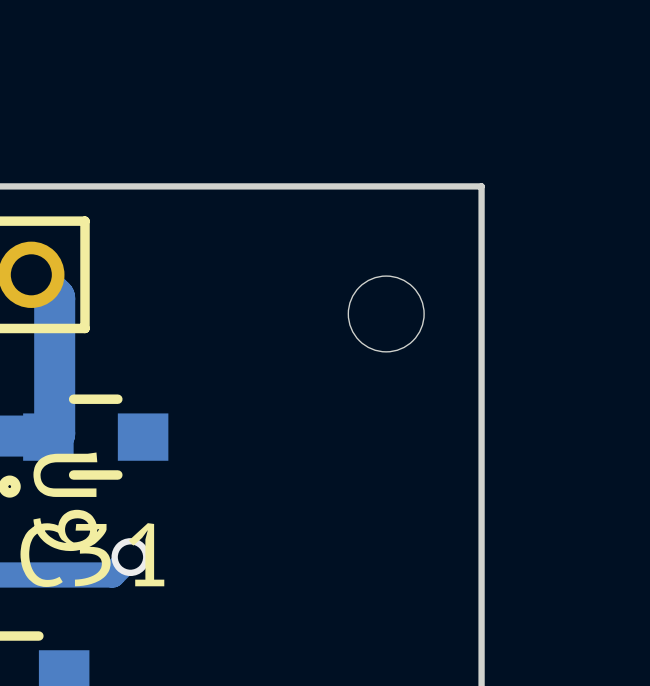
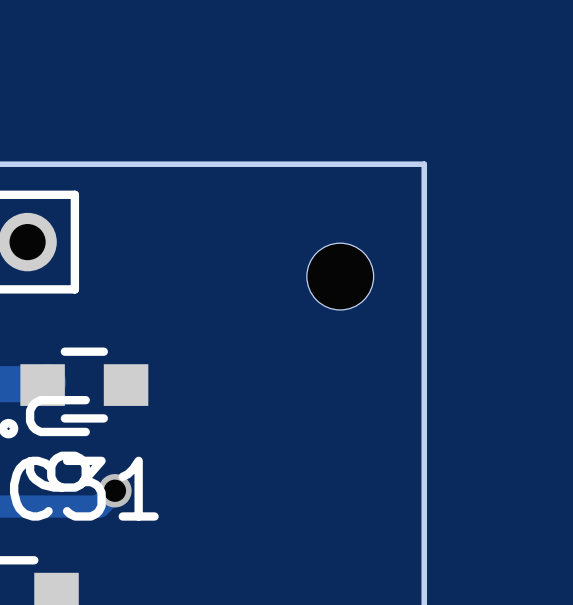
track: (31, 274) (54, 298) (54, 433) -> none

